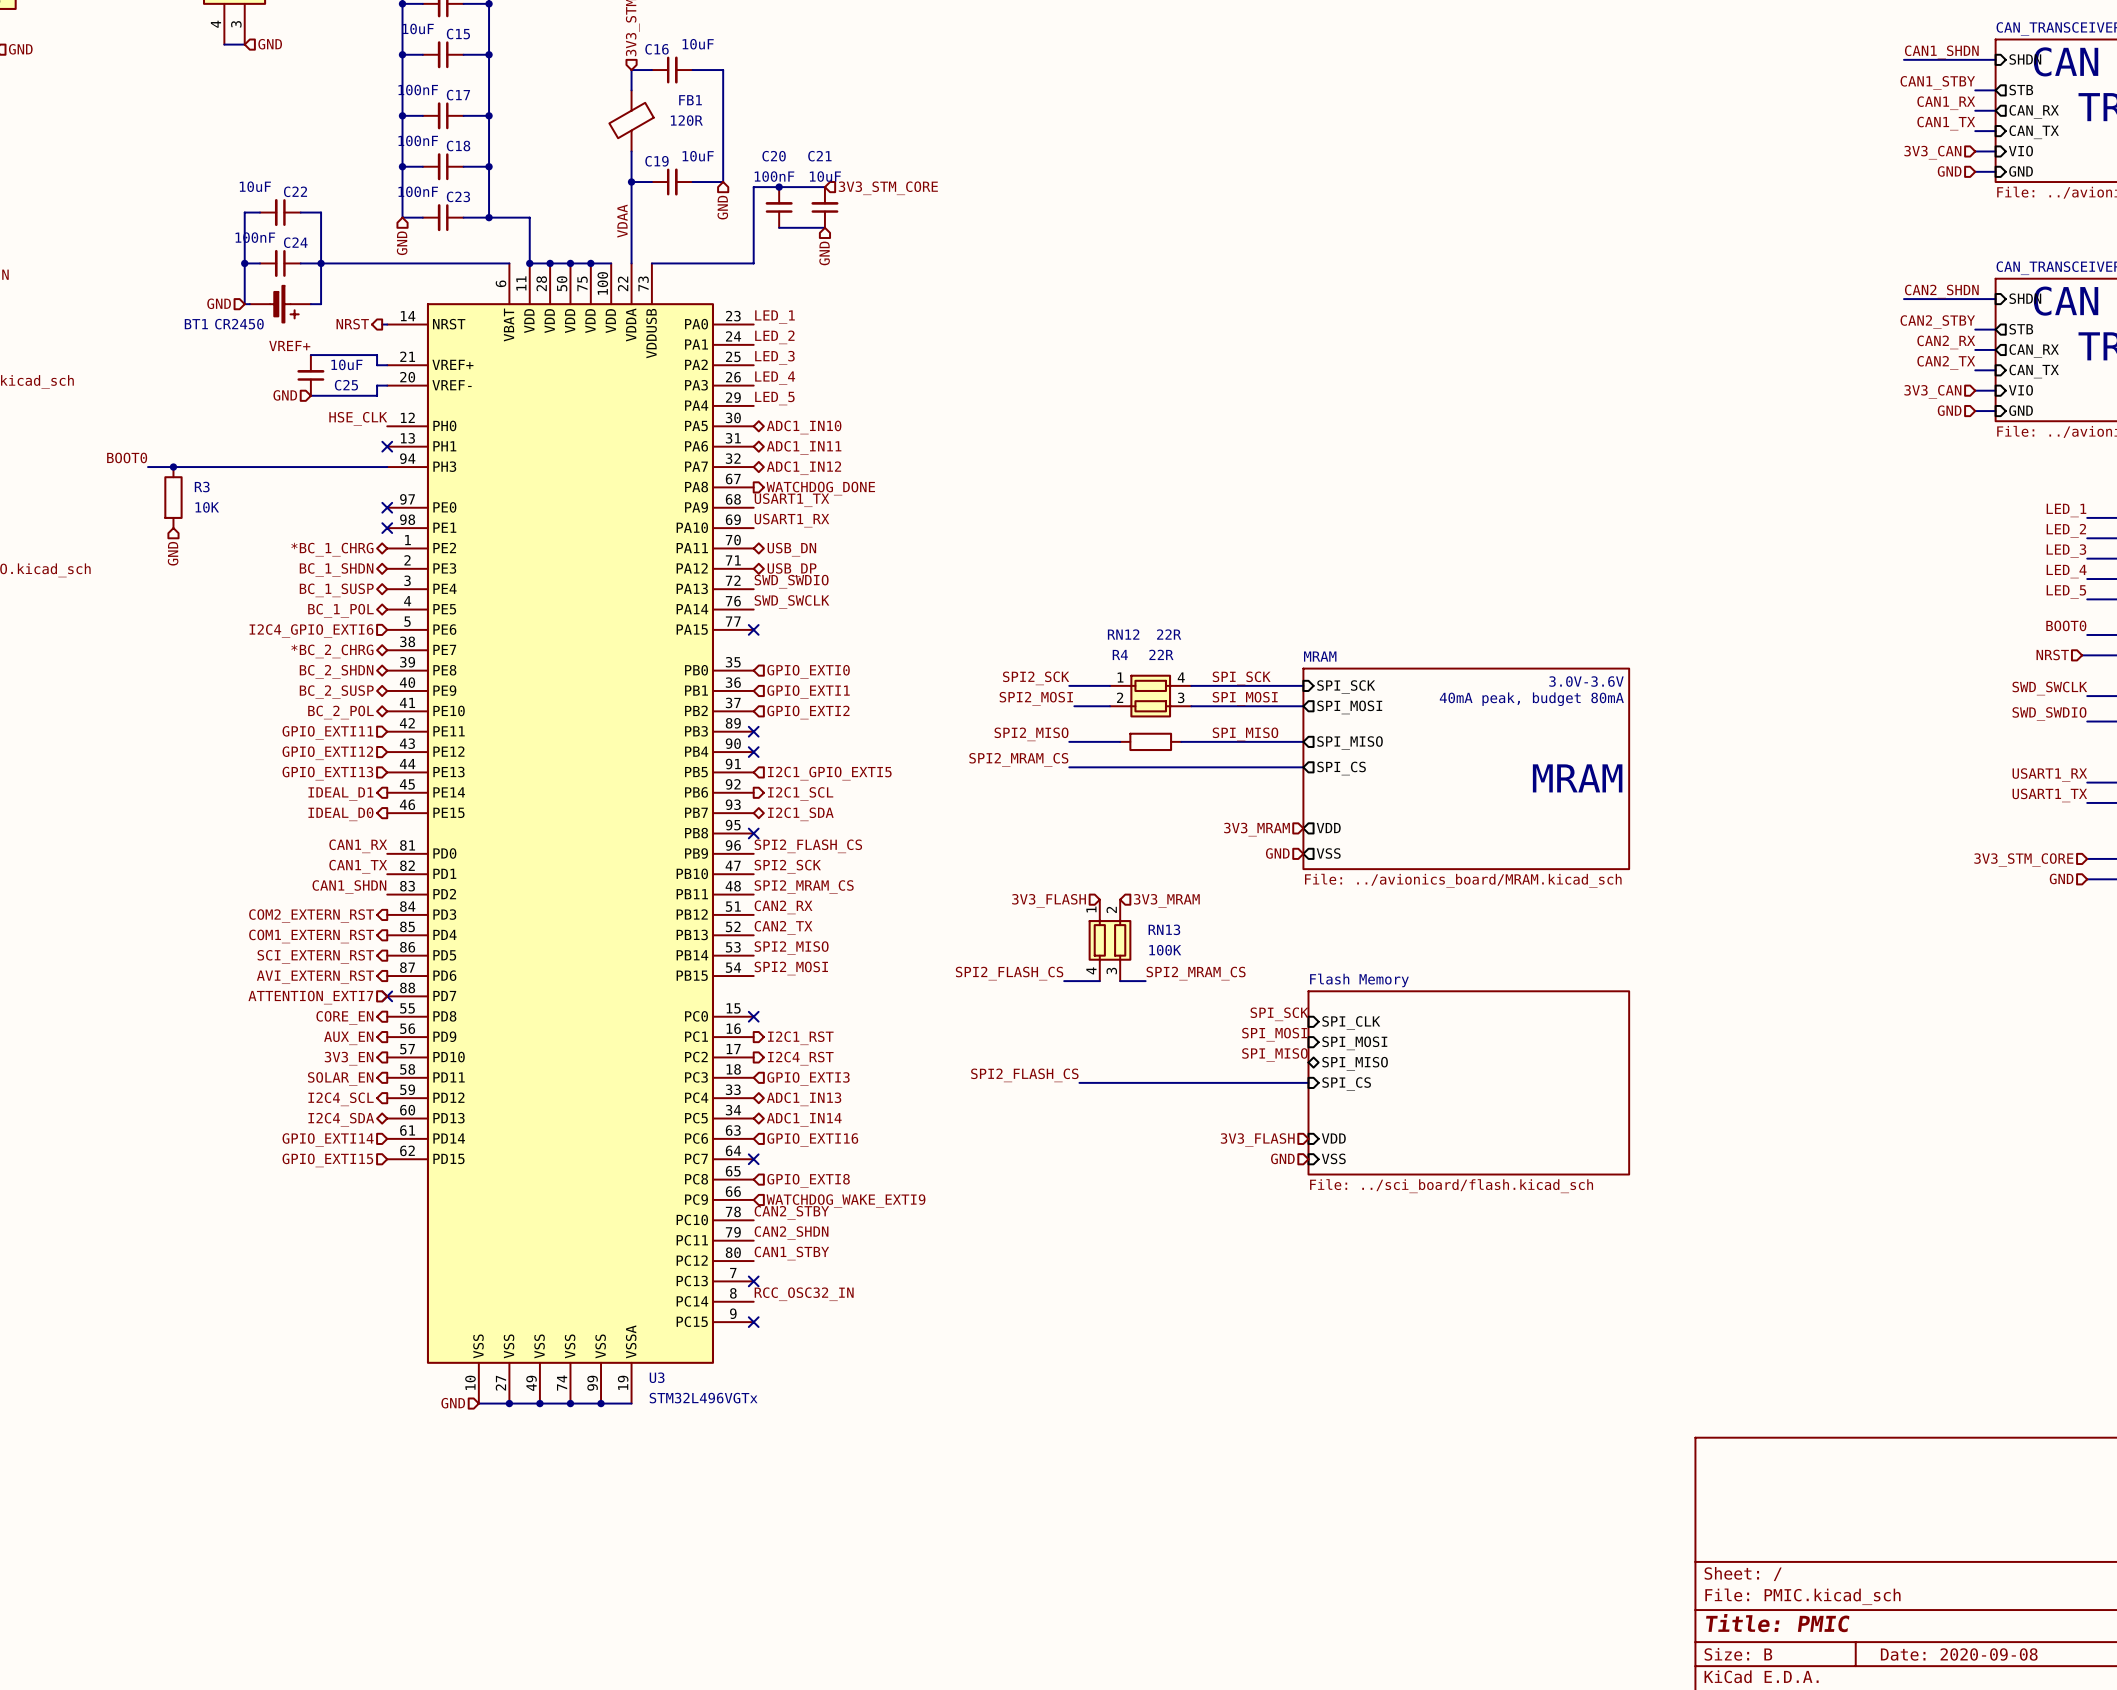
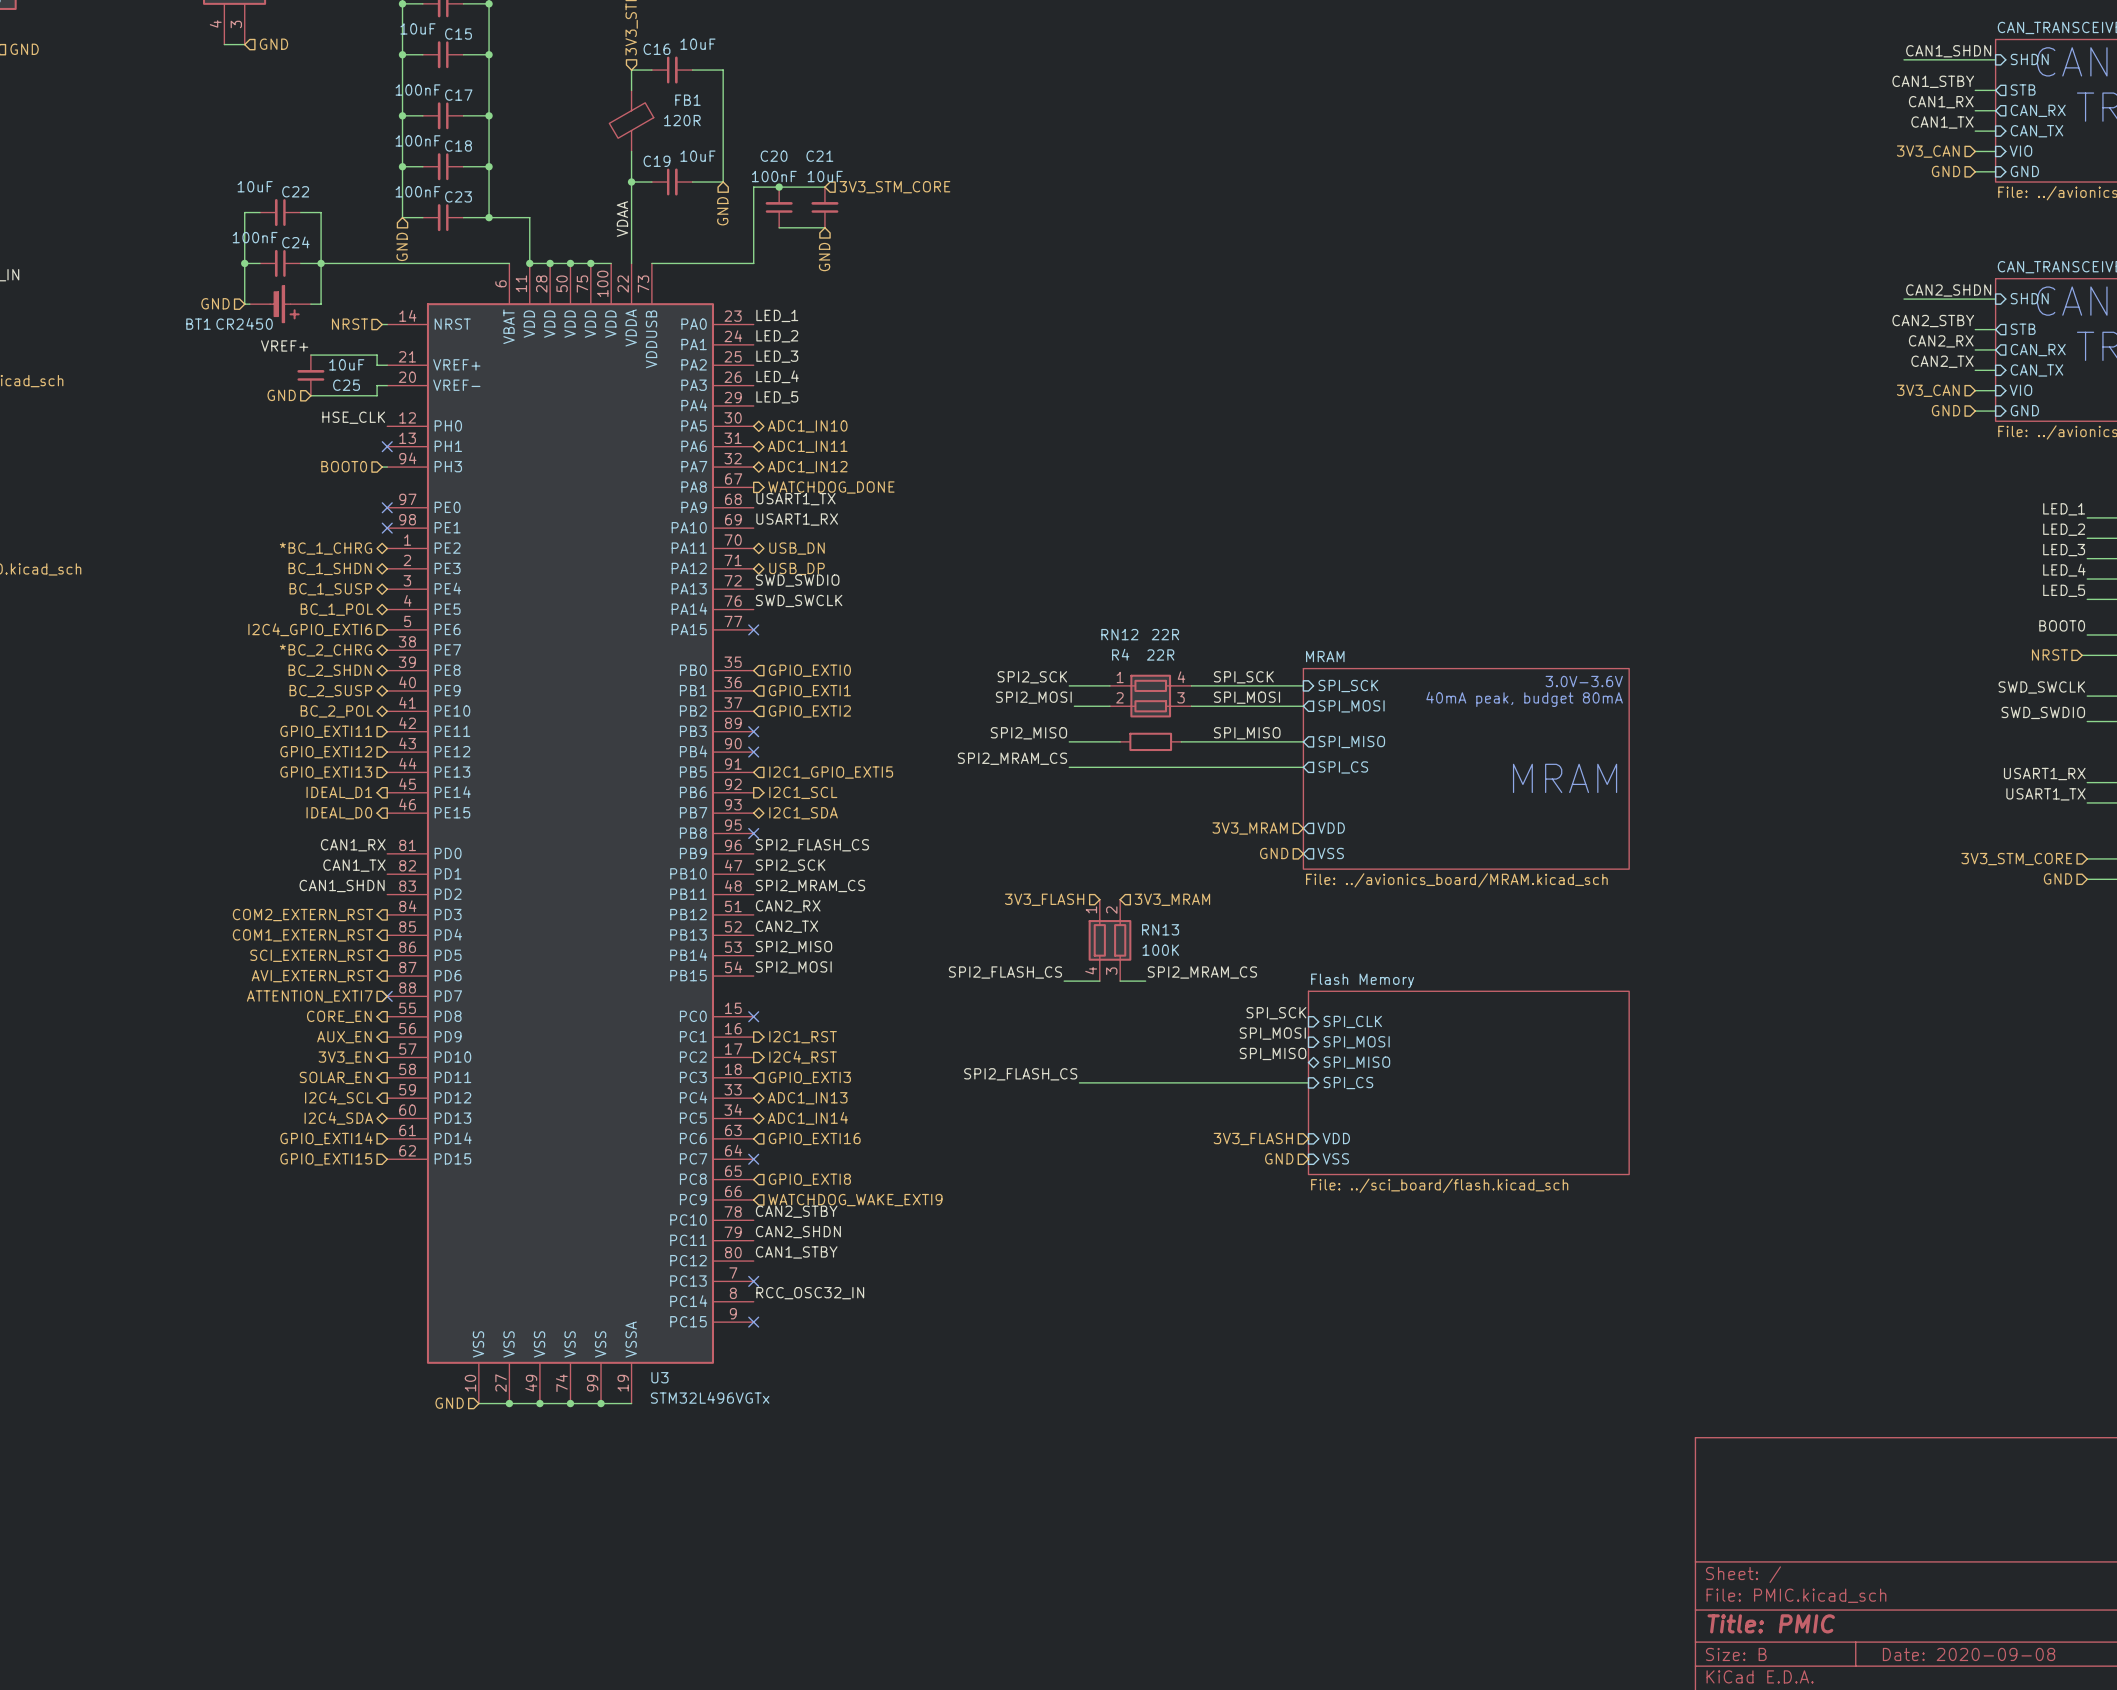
hierarchical label shape: output (352, 324) -> input (350, 324)
label: BOOT0 (127, 457) -> none
hierarchical label: none -> BOOT0 (344, 466)
wire: (148, 467) (382, 467) -> none
junction: (173, 467) -> none
R3: 10K (173, 497) -> none
hierarchical label: GND (173, 553) -> none

